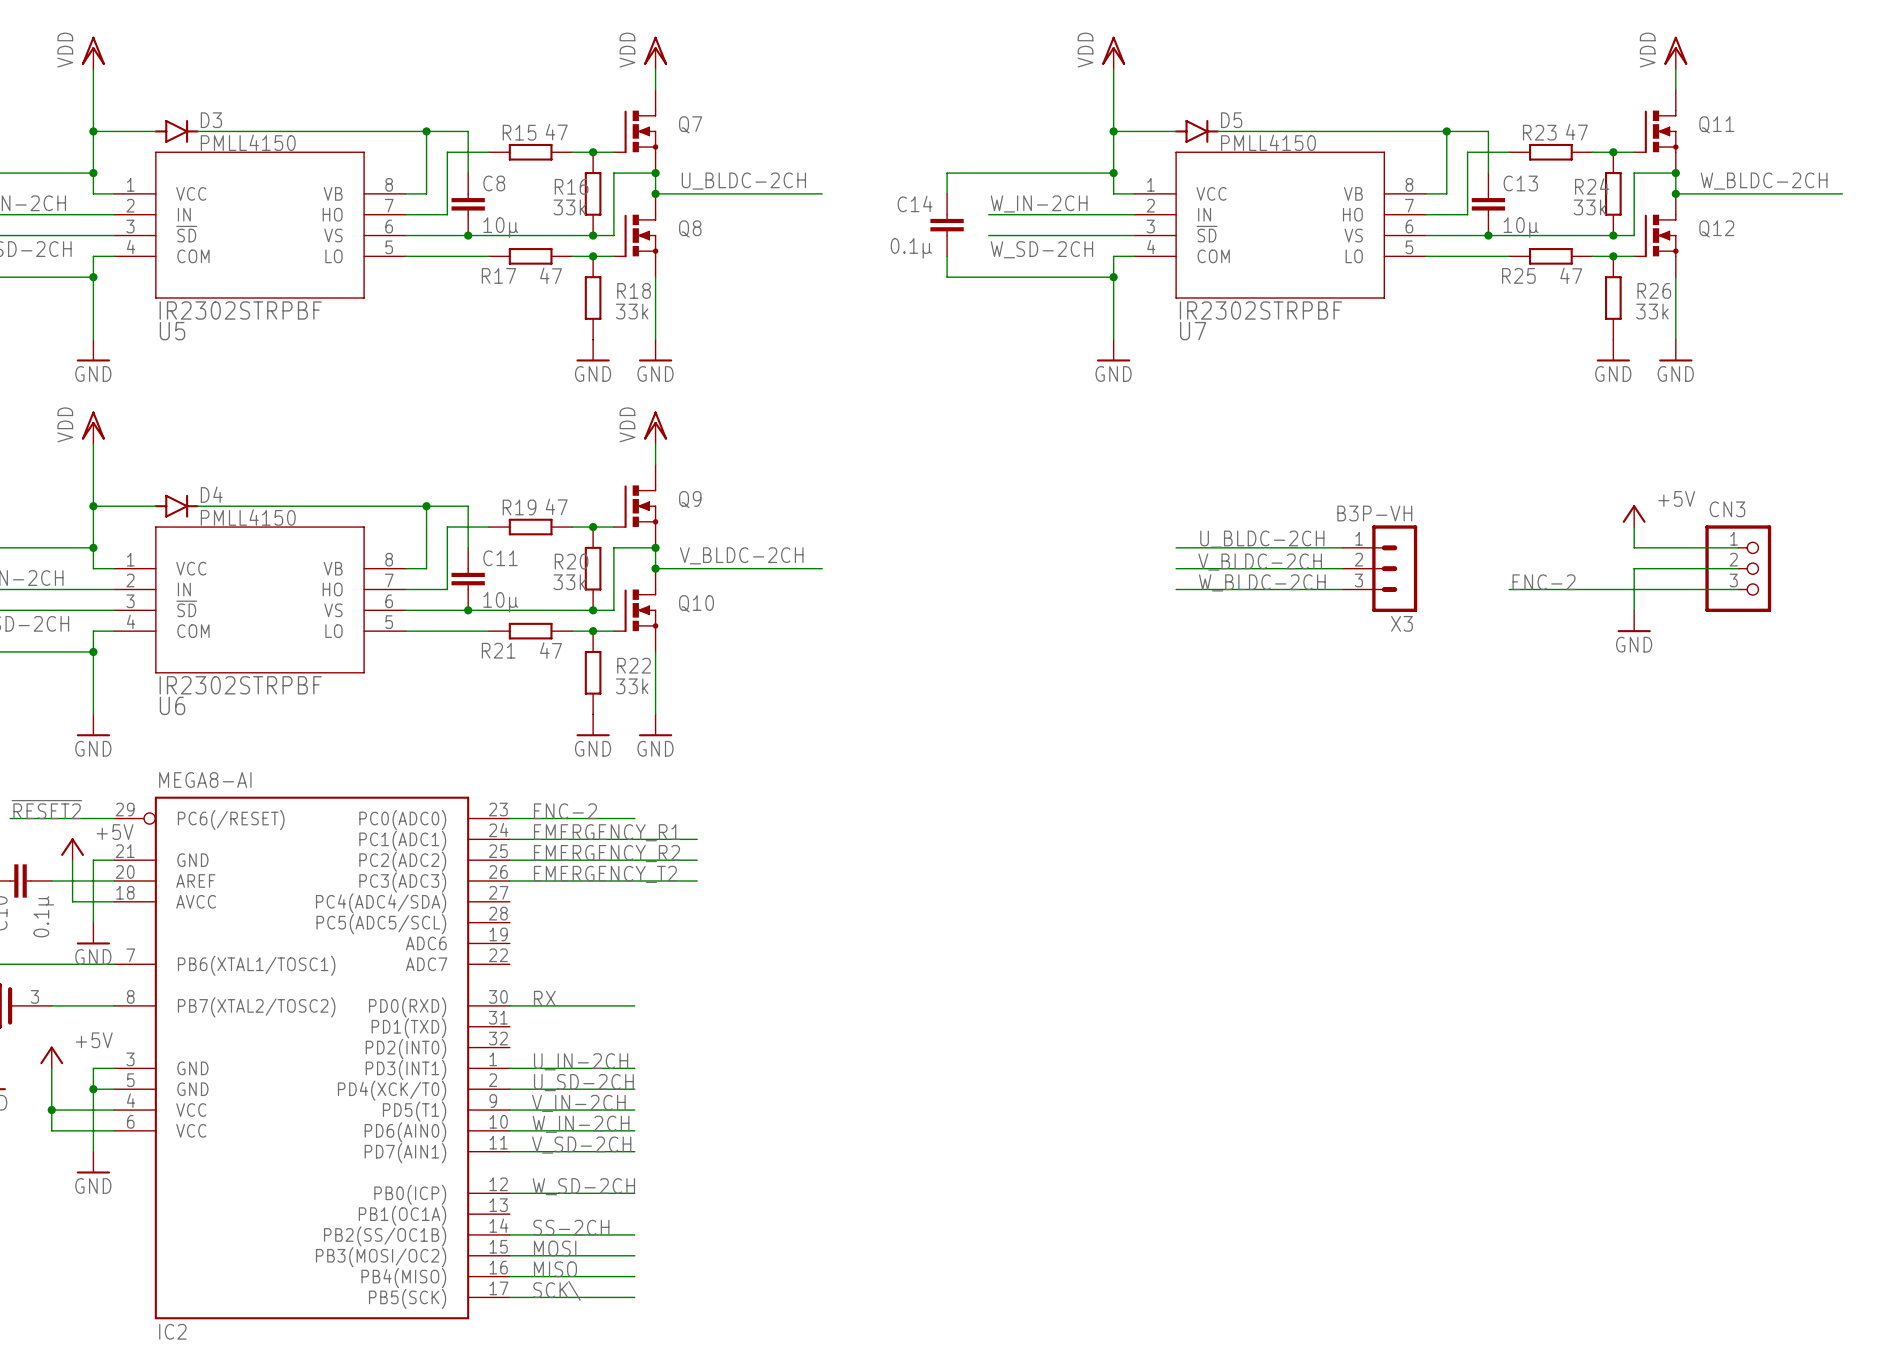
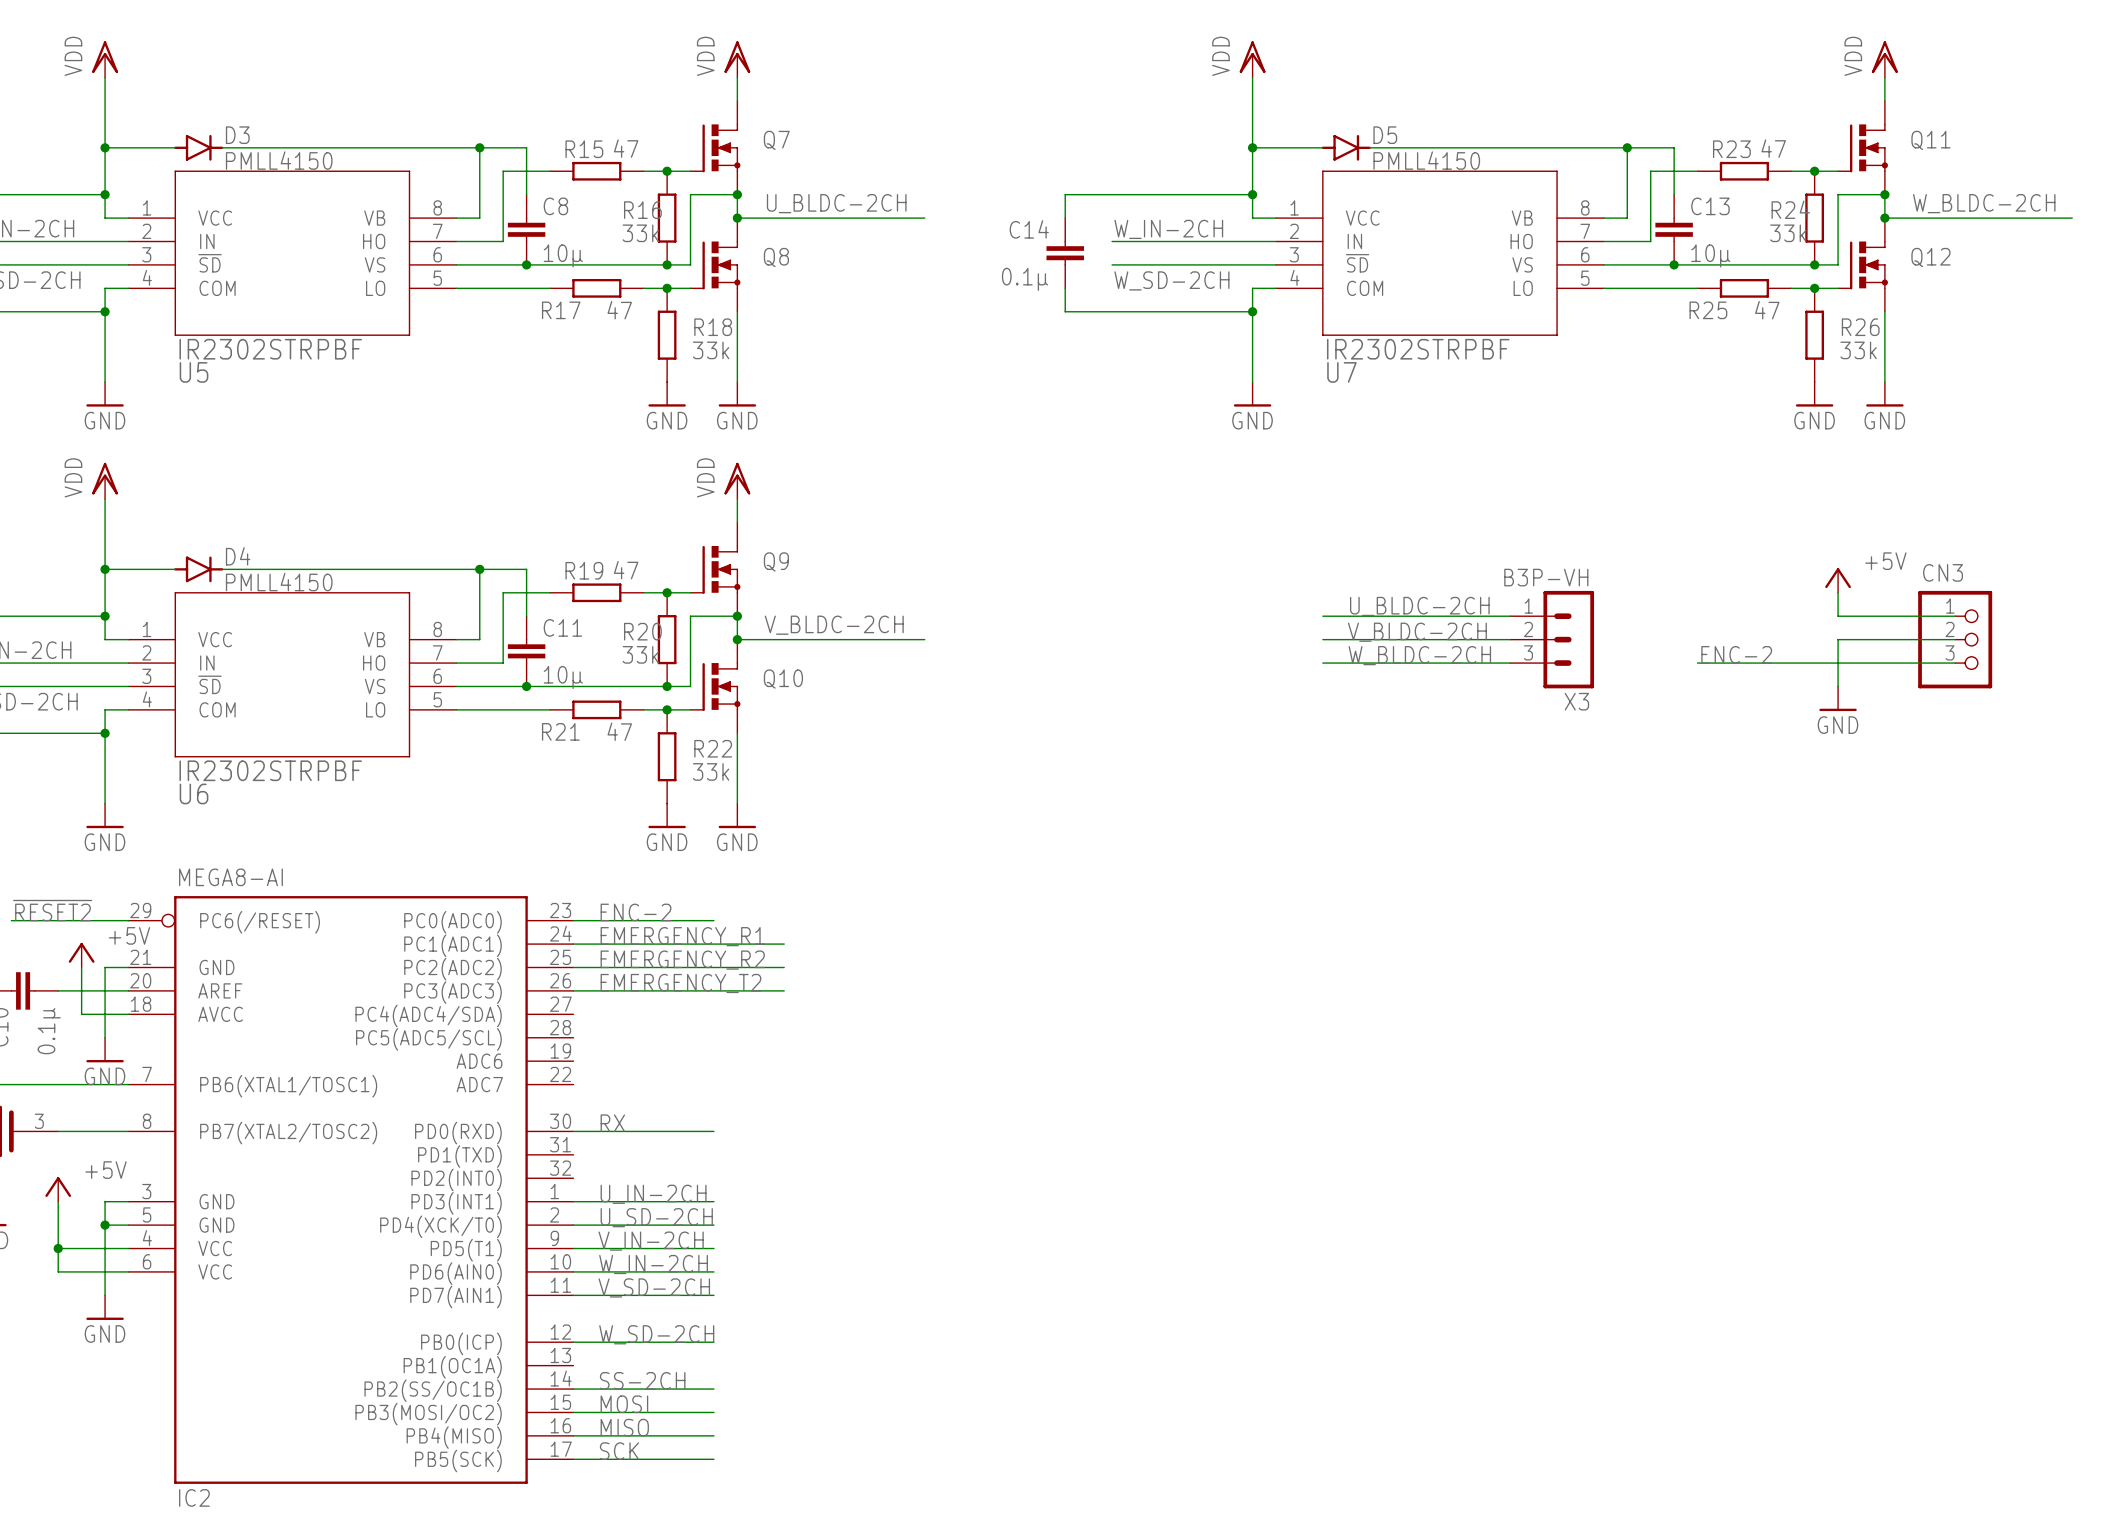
label: SCK\ (557, 1290) -> SCK (619, 1451)

